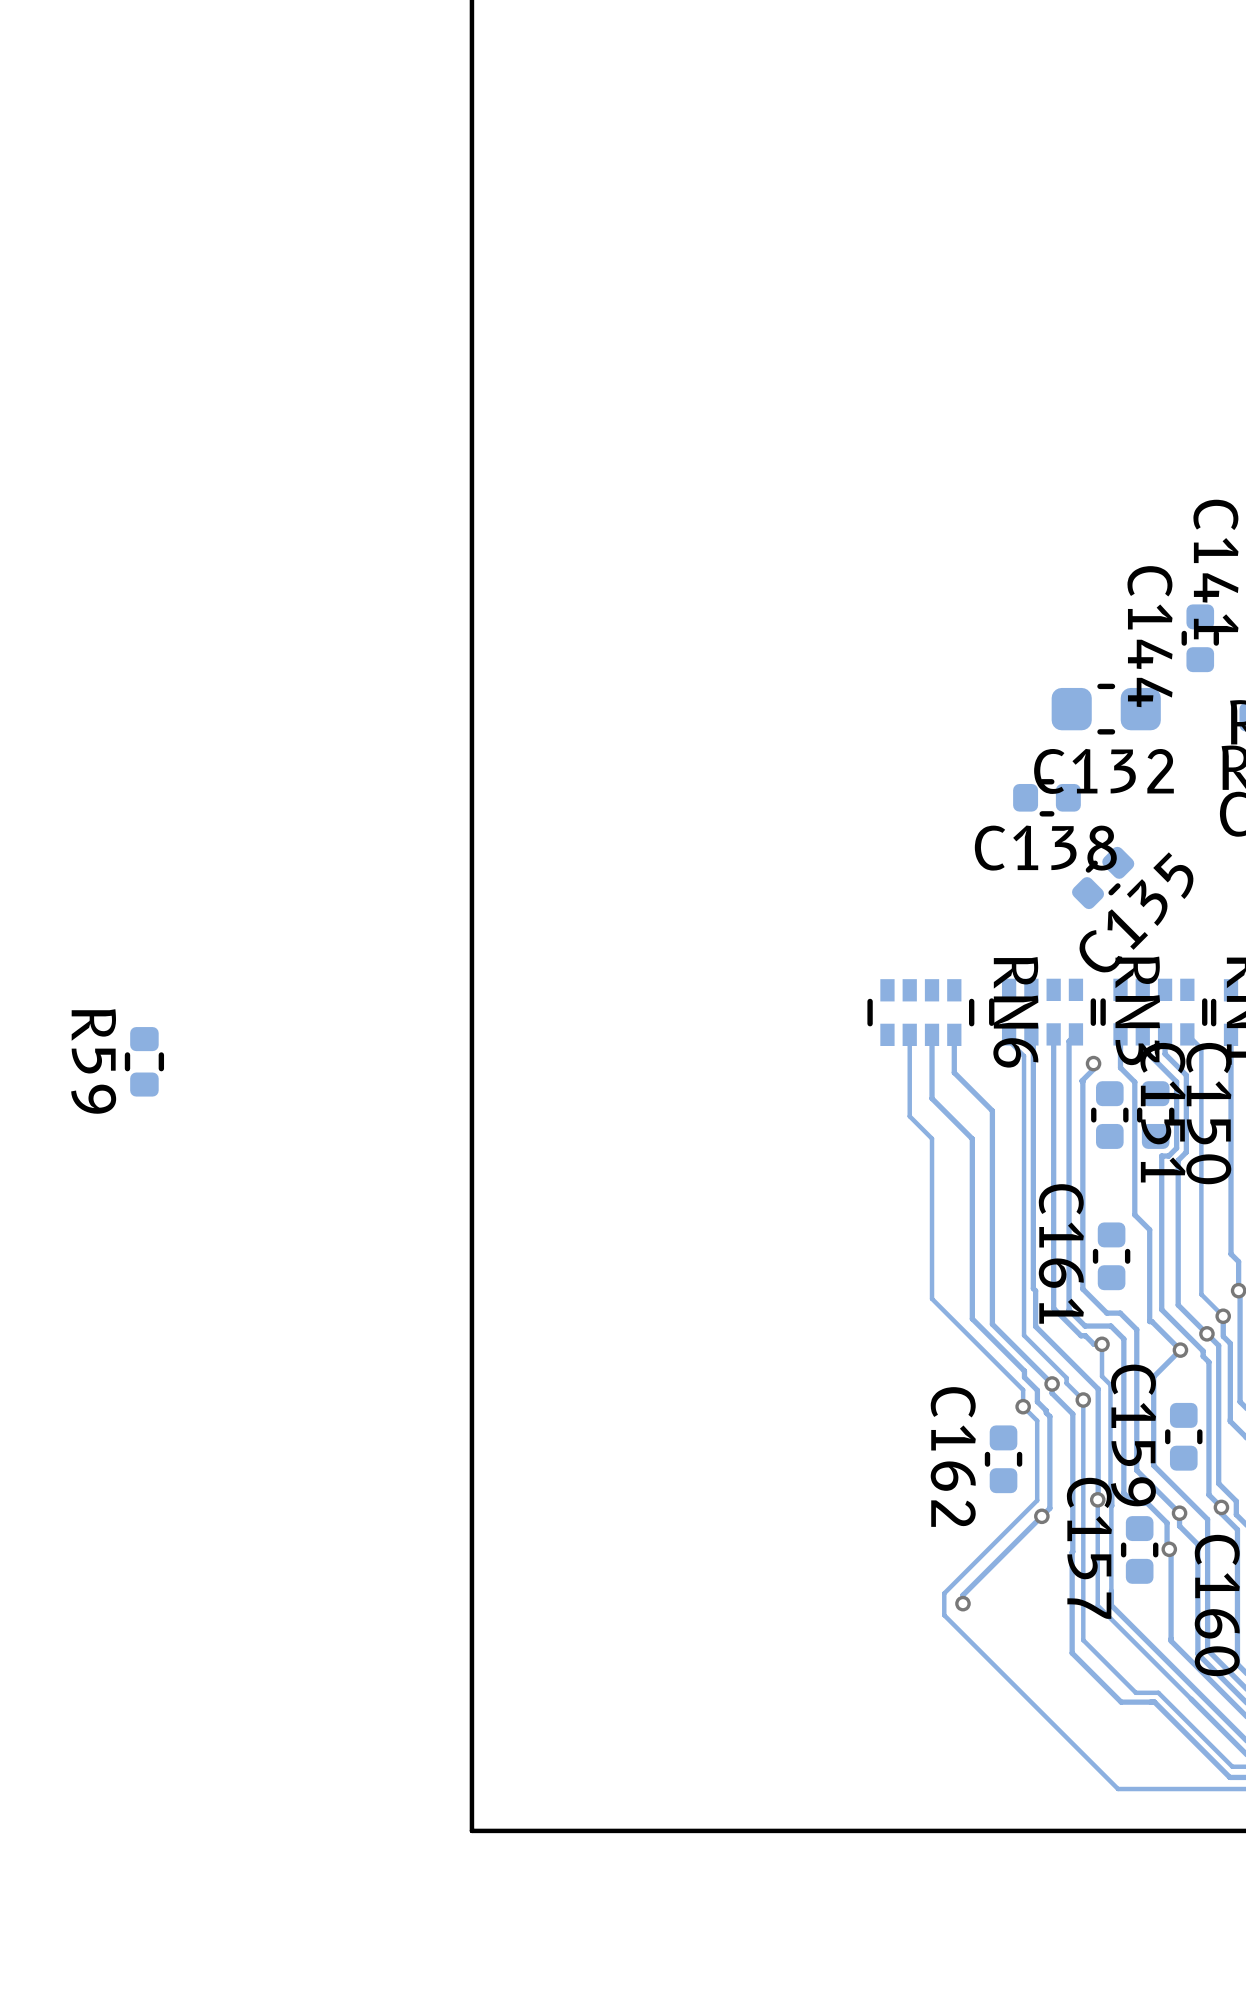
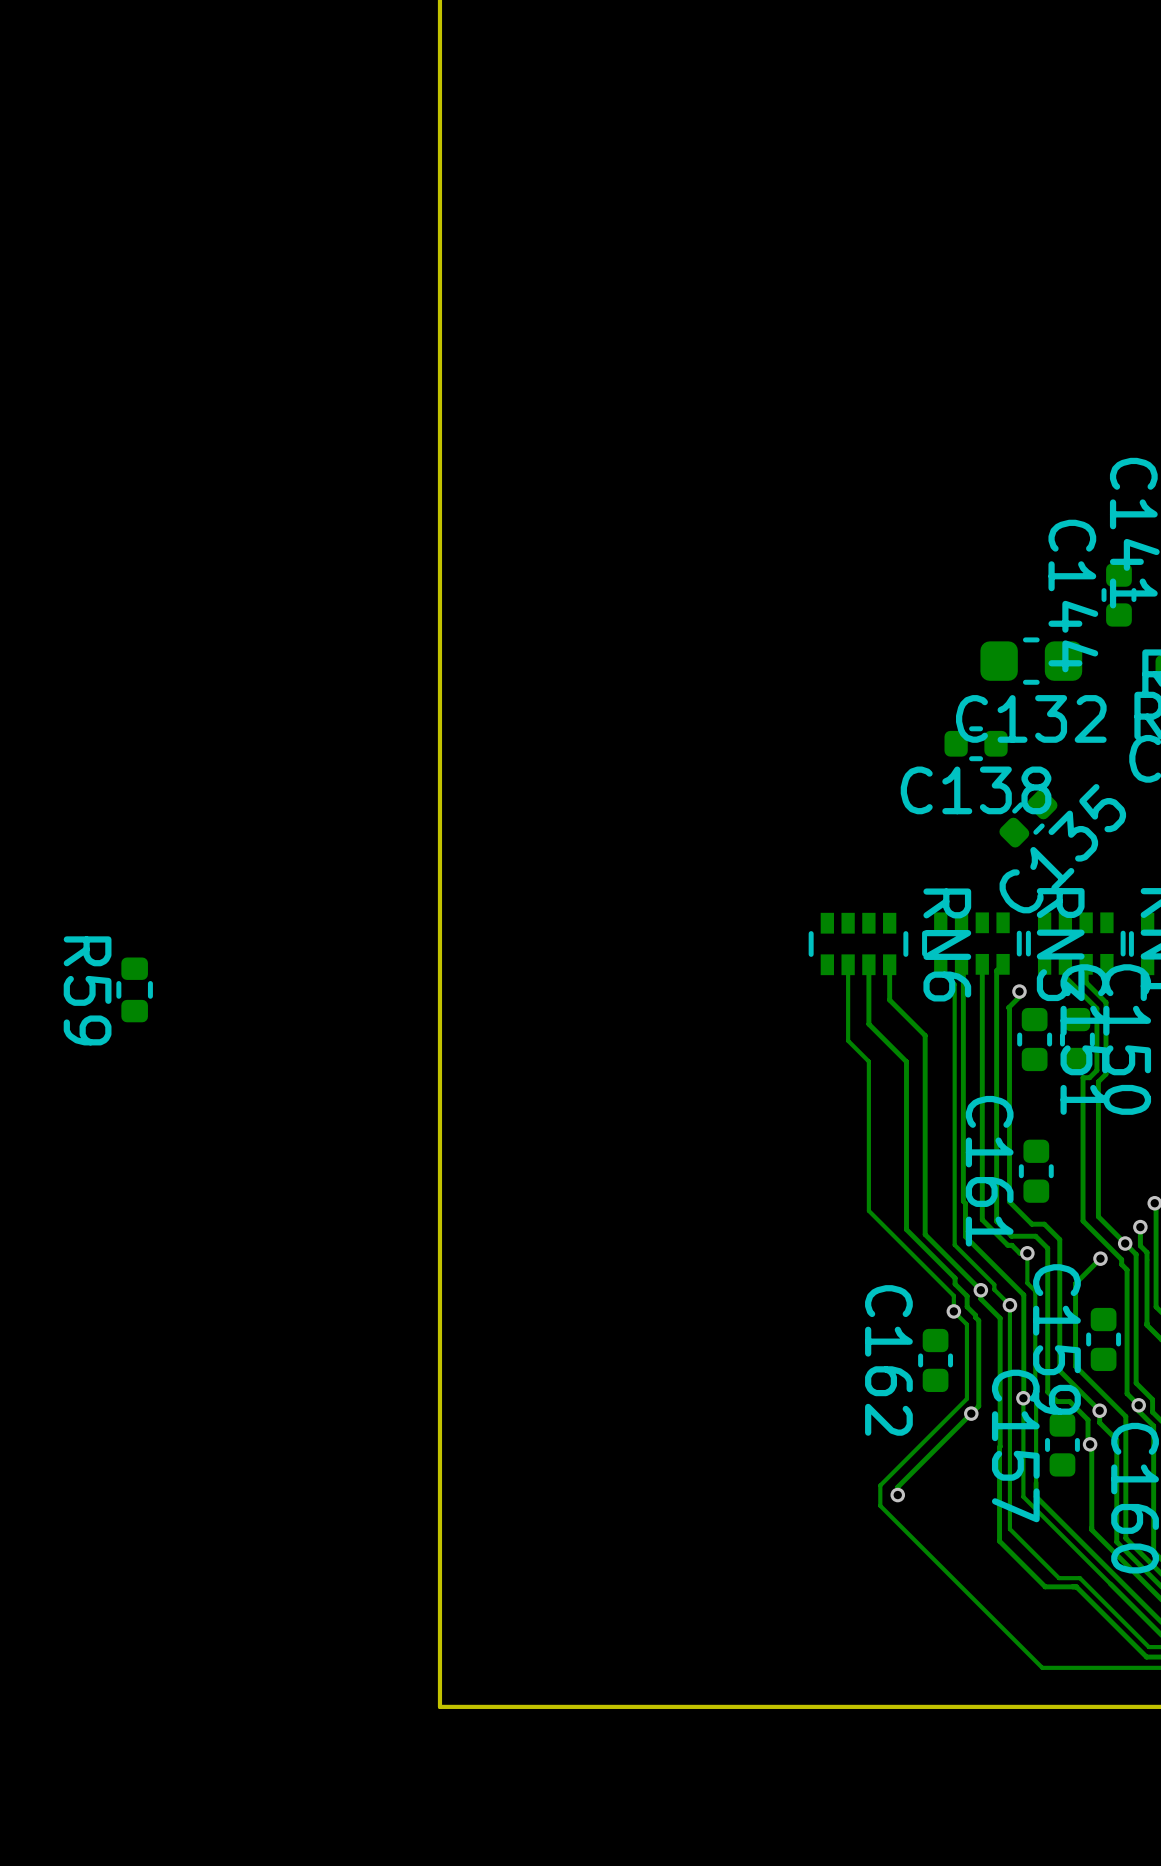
track: (1120, 1034) (1120, 1067) (1134, 1082) (1134, 1214) (1149, 1229) (1149, 1321) (1151, 1321) (1180, 1350) -> none
track: (1187, 1034) (1201, 1048) (1201, 1294) (1223, 1316) -> none
track: (1231, 1034) (1231, 1254) (1238, 1261) (1238, 1290) -> none

